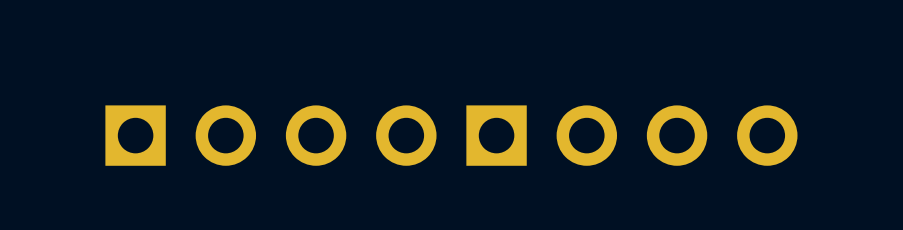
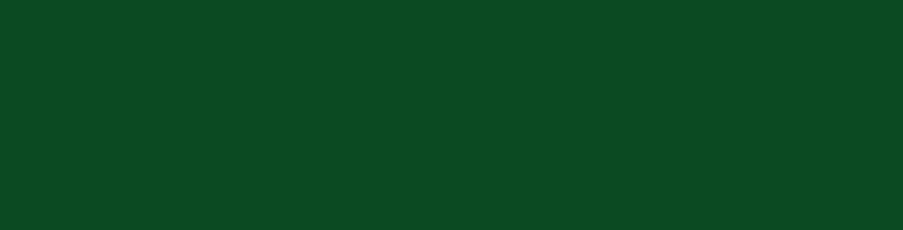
part: (270, 135) -> none
part: (631, 135) -> none

